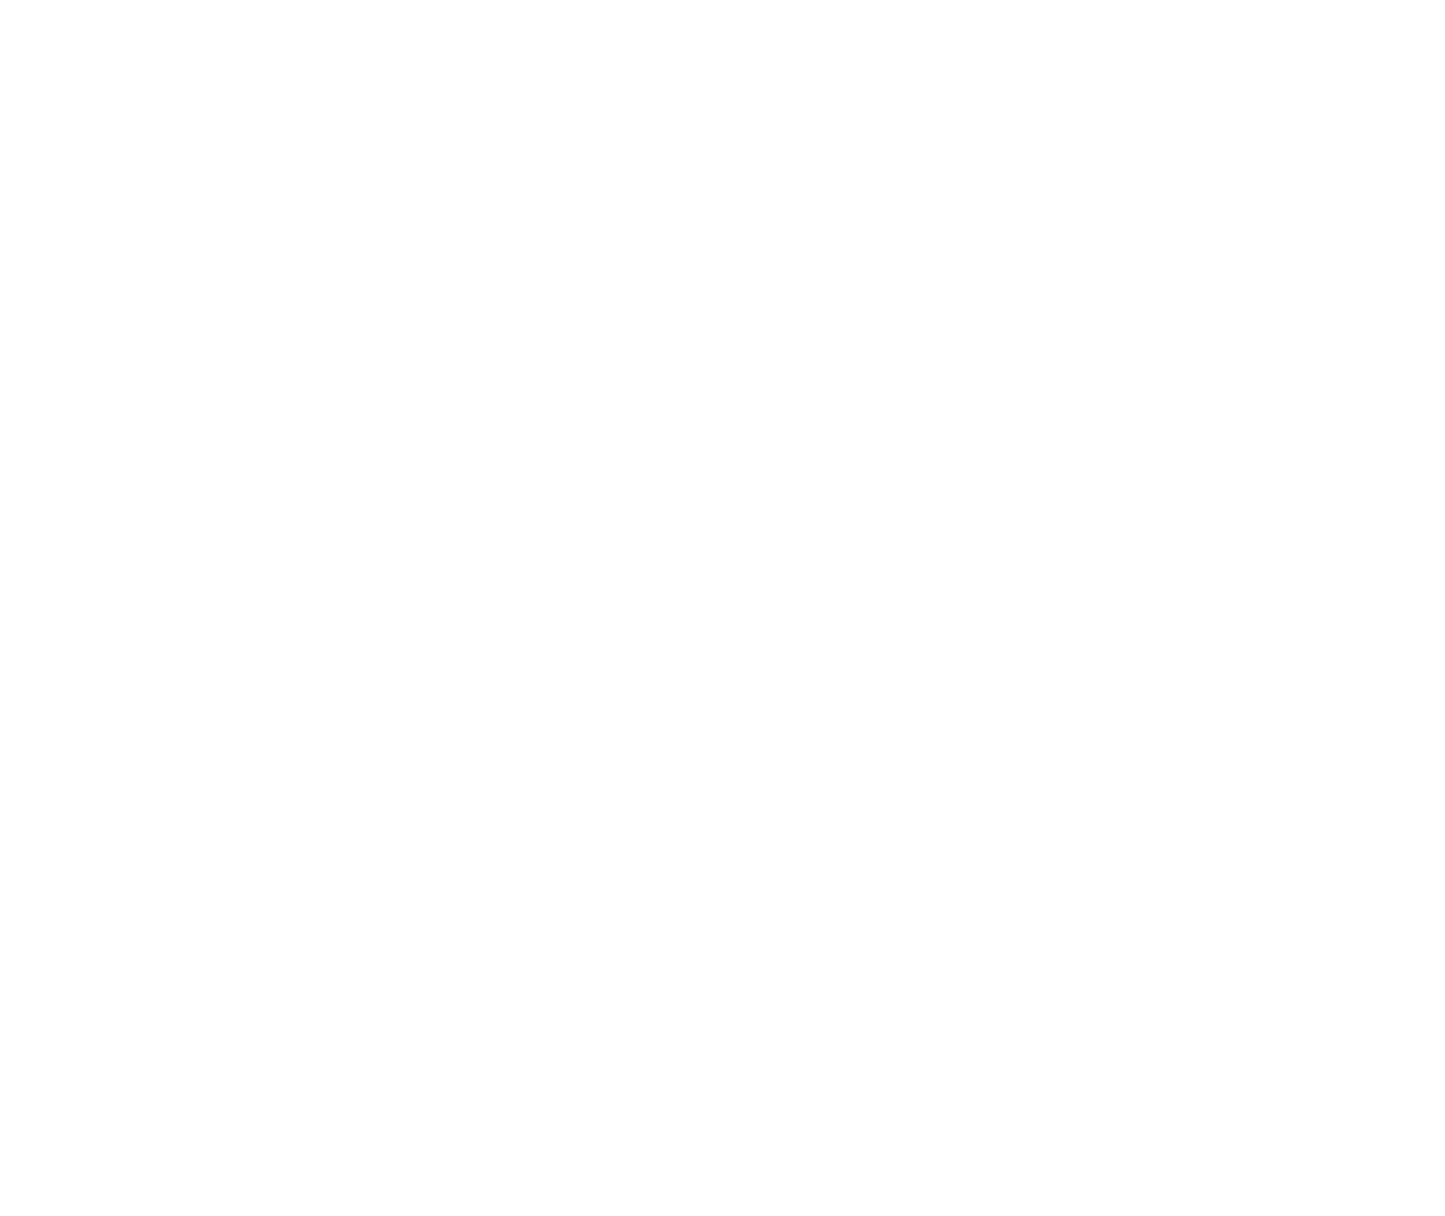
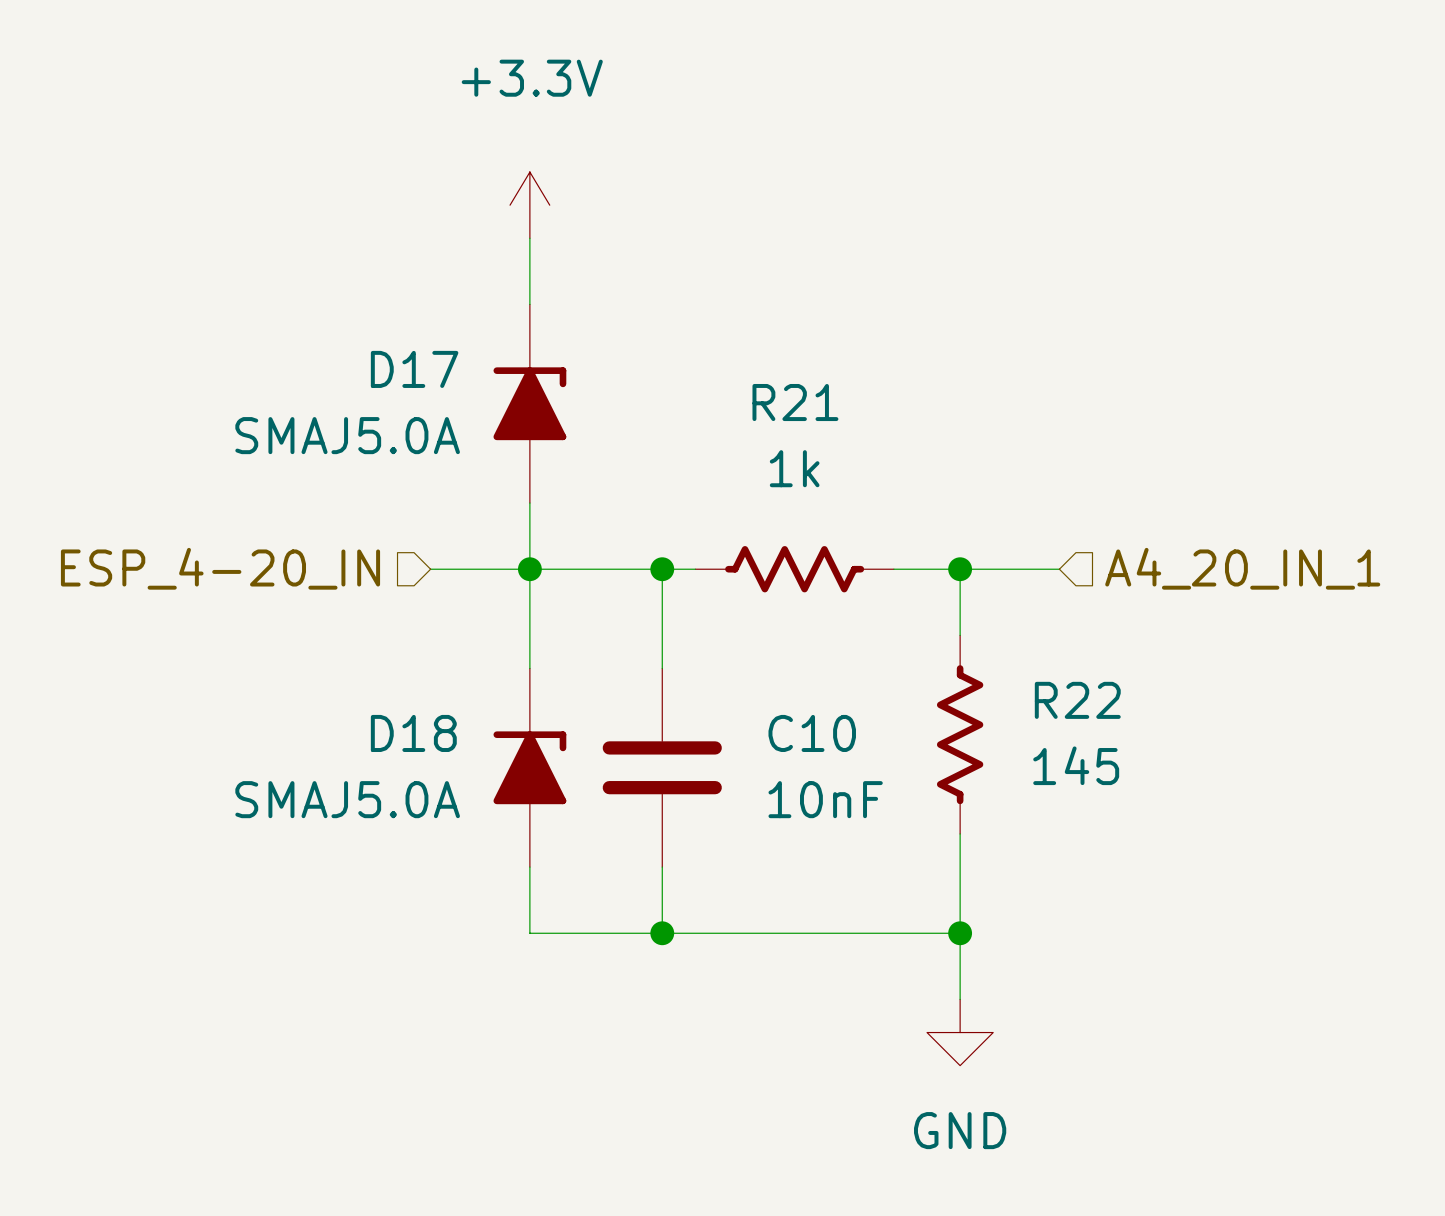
power symbol: none -> +3.3V (529, 205)
wire: none -> (529, 238) (529, 304)
D17: none -> SMAJ5.0A (529, 403)
wire: none -> (529, 503) (529, 668)
wire: none -> (430, 569) (695, 569)
junction: none -> (529, 569)
wire: none -> (662, 569) (662, 668)
junction: none -> (662, 569)
R21: none -> 1k (794, 569)
wire: none -> (893, 569) (1059, 569)
wire: none -> (960, 569) (960, 635)
junction: none -> (960, 569)
hierarchical label: none -> ESP_4-20_IN (220, 568)
hierarchical label: none -> A4_20_IN_1 (1242, 568)
R22: none -> 145 (960, 734)
D18: none -> SMAJ5.0A (529, 767)
C10: none -> 10nF (662, 767)
wire: none -> (960, 833) (960, 999)
wire: none -> (529, 867) (529, 933) (960, 933)
wire: none -> (662, 867) (662, 933)
junction: none -> (662, 933)
junction: none -> (960, 933)
power symbol: none -> GND (960, 1032)

